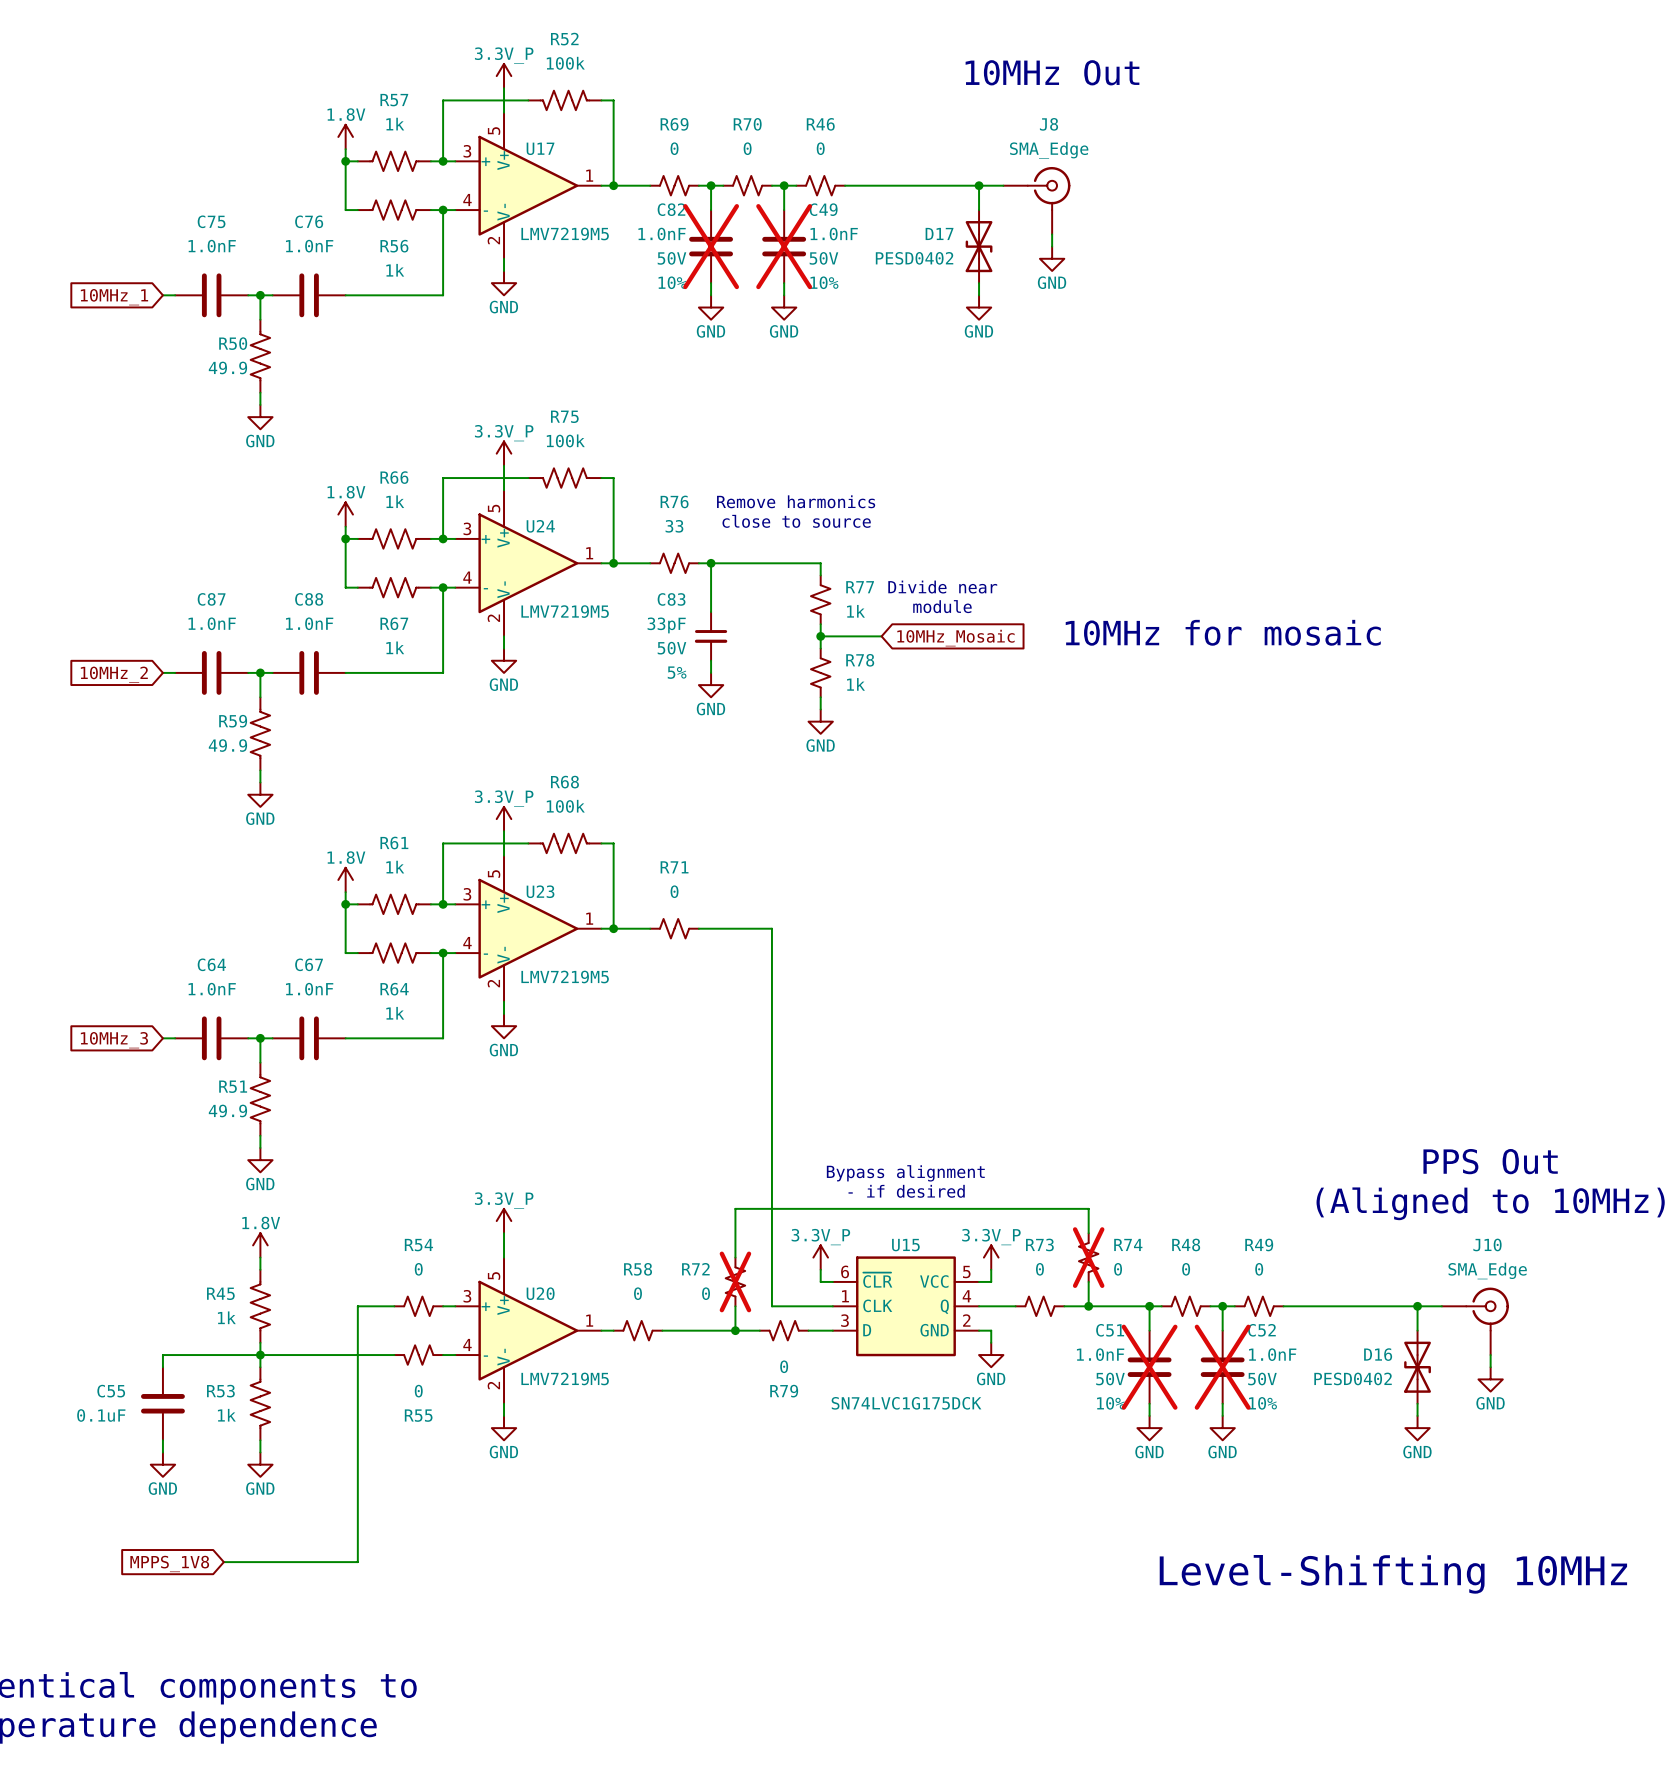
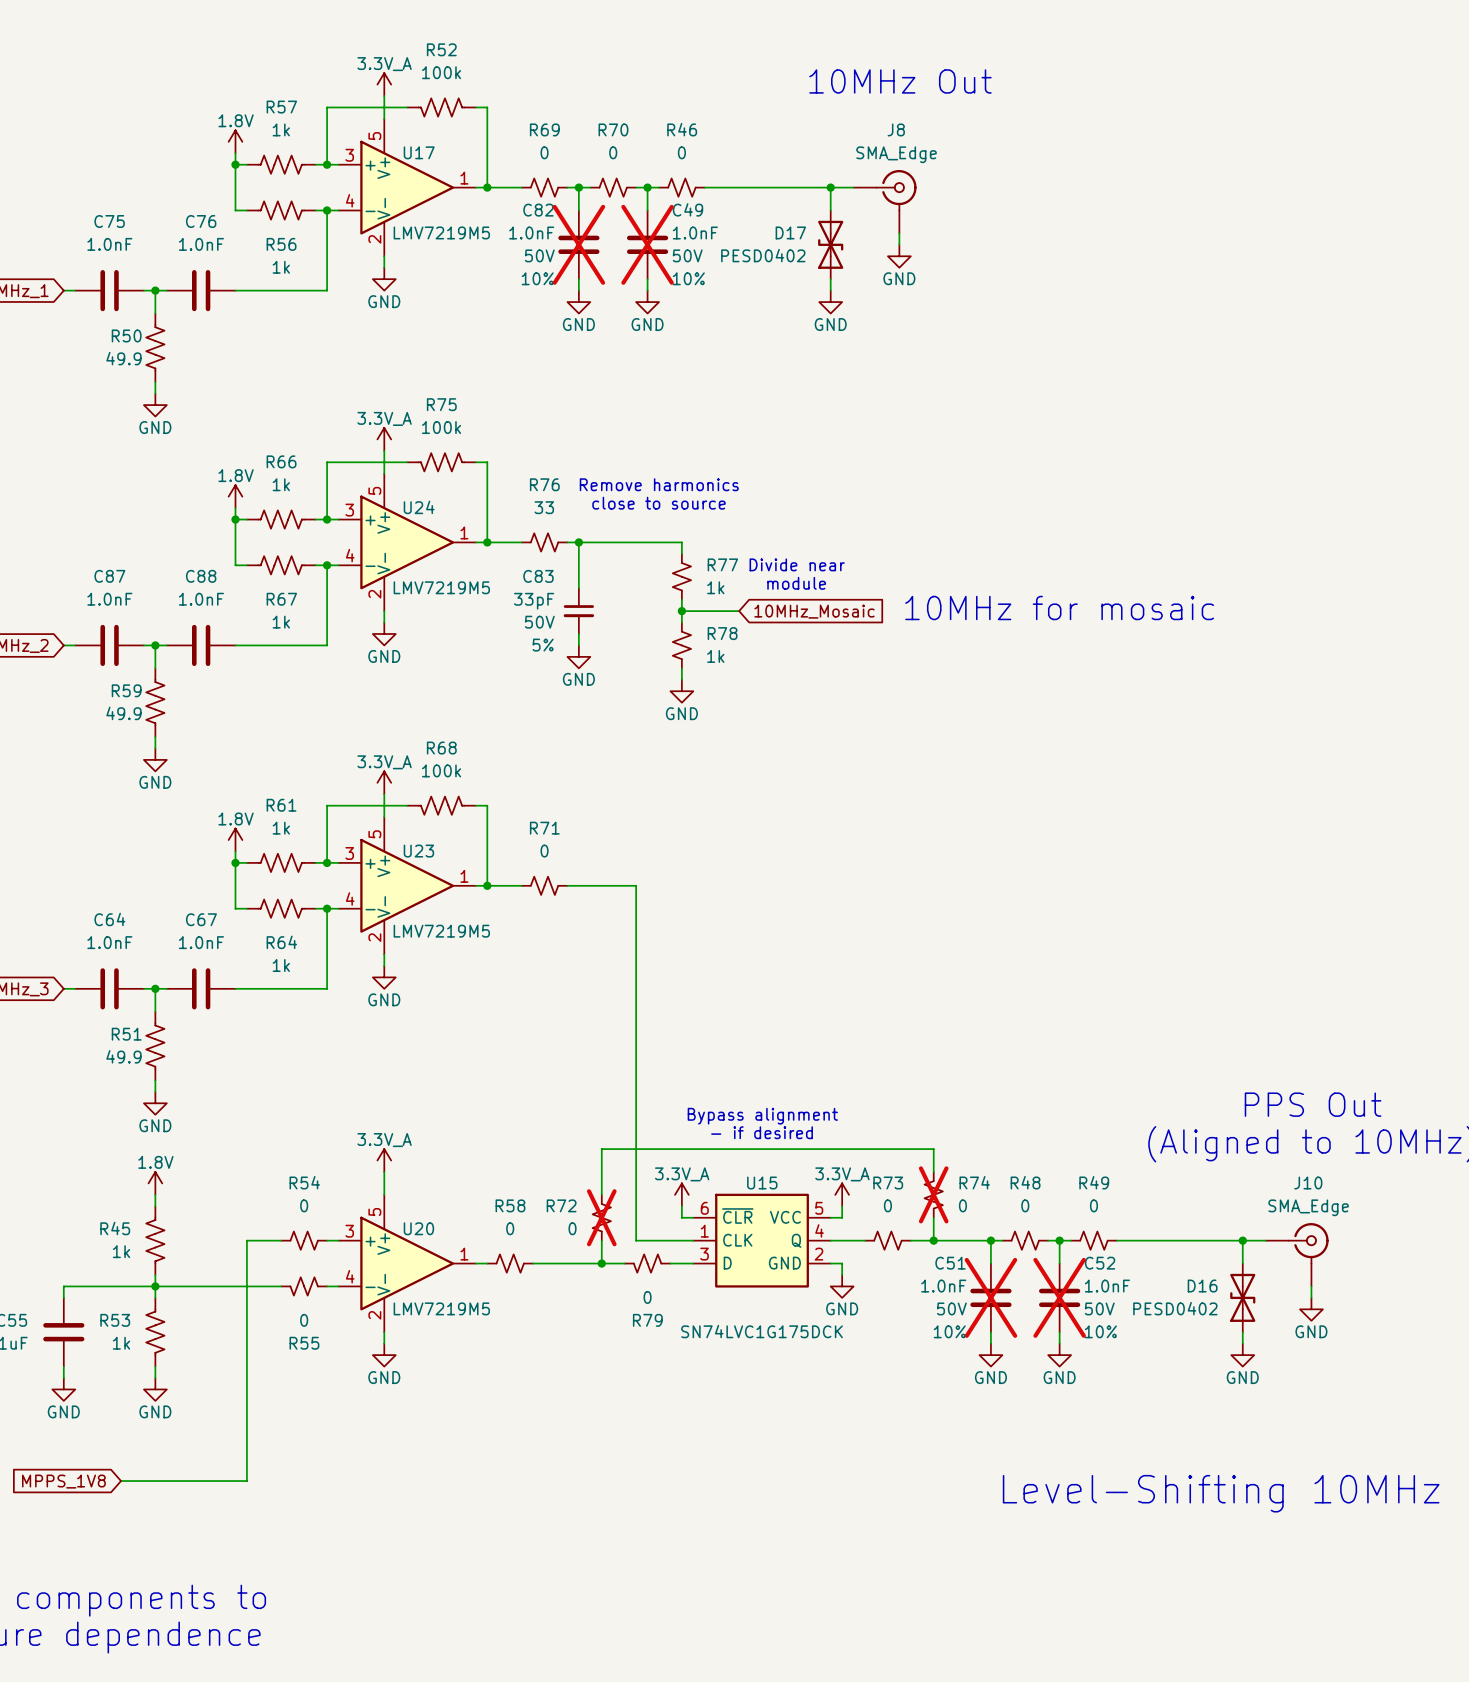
power symbol: 3.3V_P (504, 76) -> 3.3V_A (384, 84)
power symbol: 3.3V_P (504, 453) -> 3.3V_A (384, 439)
power symbol: 3.3V_P (504, 819) -> 3.3V_A (384, 782)
power symbol: 3.3V_P (504, 1221) -> 3.3V_A (384, 1160)
power symbol: 3.3V_P (820, 1257) -> 3.3V_A (681, 1194)
power symbol: 3.3V_P (991, 1257) -> 3.3V_A (842, 1194)

